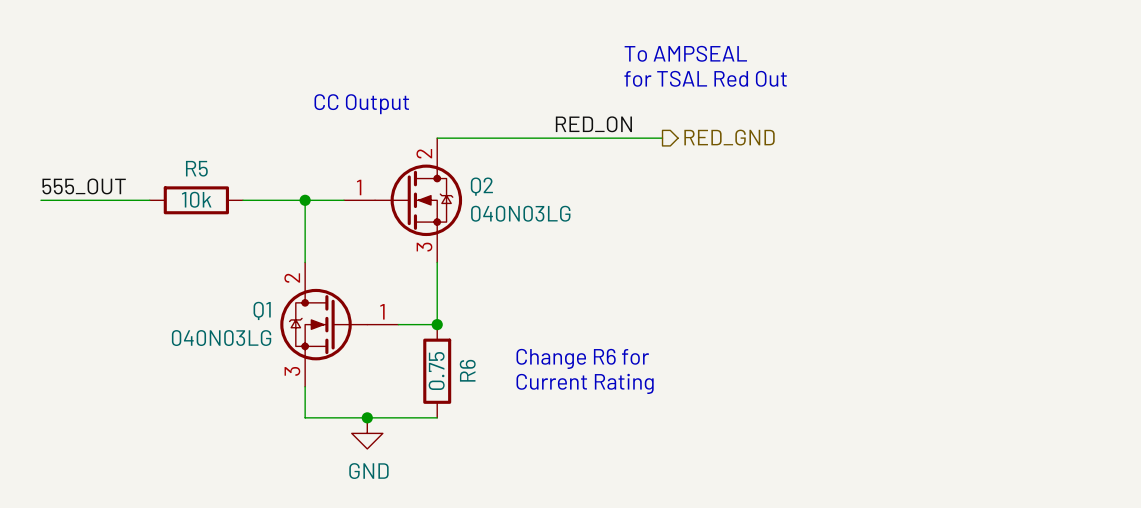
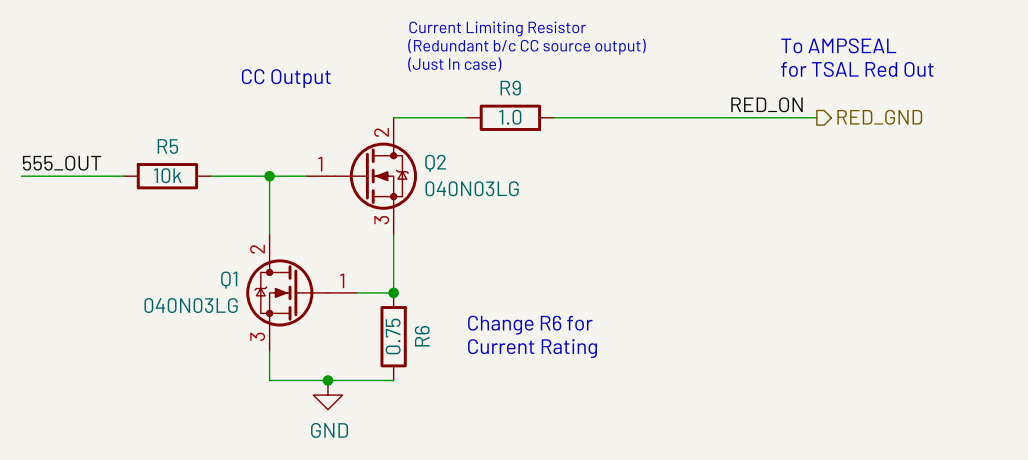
text: none -> Current Limiting Resistor (497, 28)
text position: To AMPSEAL (685, 53) -> To AMPSEAL (838, 45)
text: none -> (Redundant b/c CC source output) (526, 46)
text position: for TSAL Red Out (705, 78) -> for TSAL Red Out (857, 69)
text: none -> (Just In case) (454, 64)
text position: CC Output (361, 104) -> CC Output (286, 78)
label position: RED_ON (593, 124) -> RED_ON (766, 104)
hierarchical label position: RED_GND (729, 137) -> RED_GND (879, 117)
wire: (514, 138) (608, 138) -> none
R9: none -> 1.0 (510, 117)
wire: none -> (605, 117) (816, 117)

